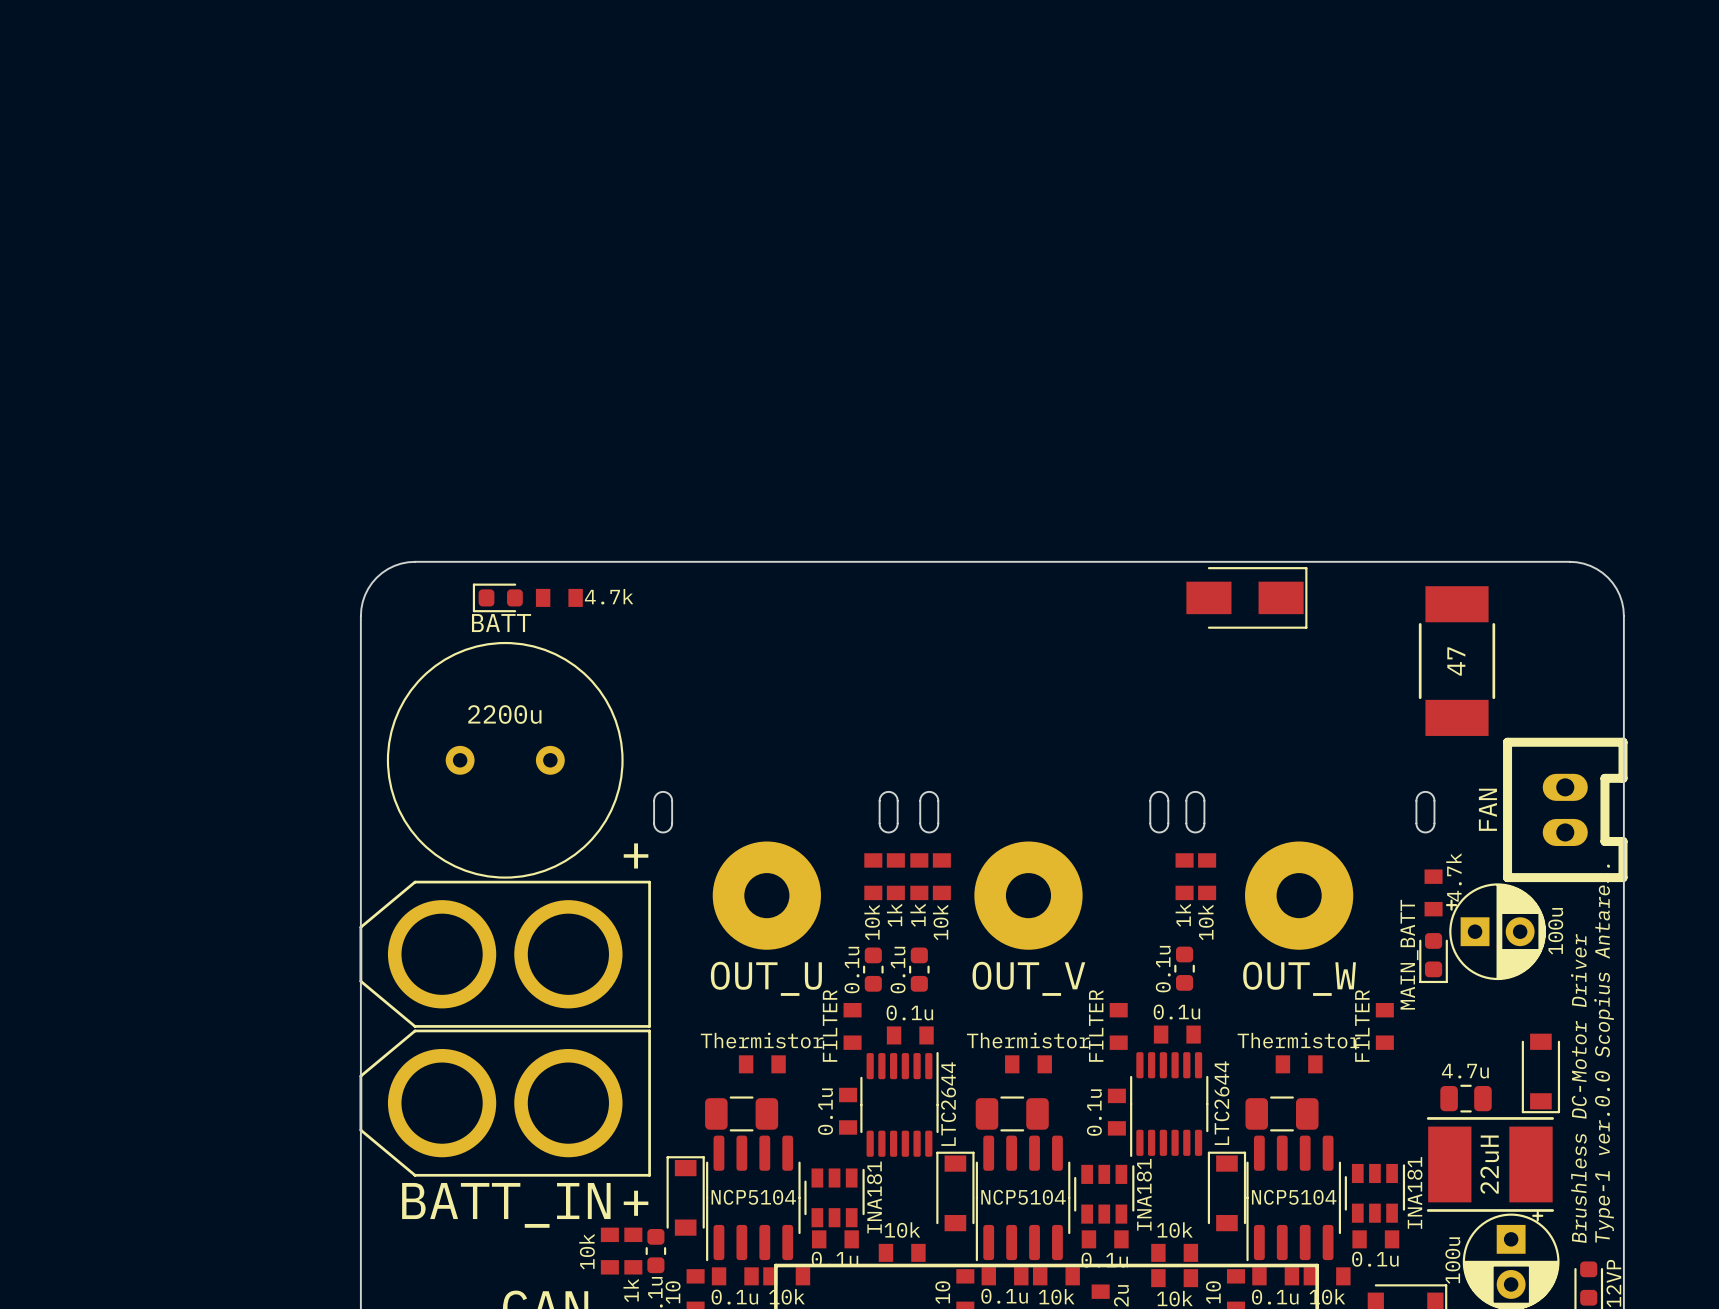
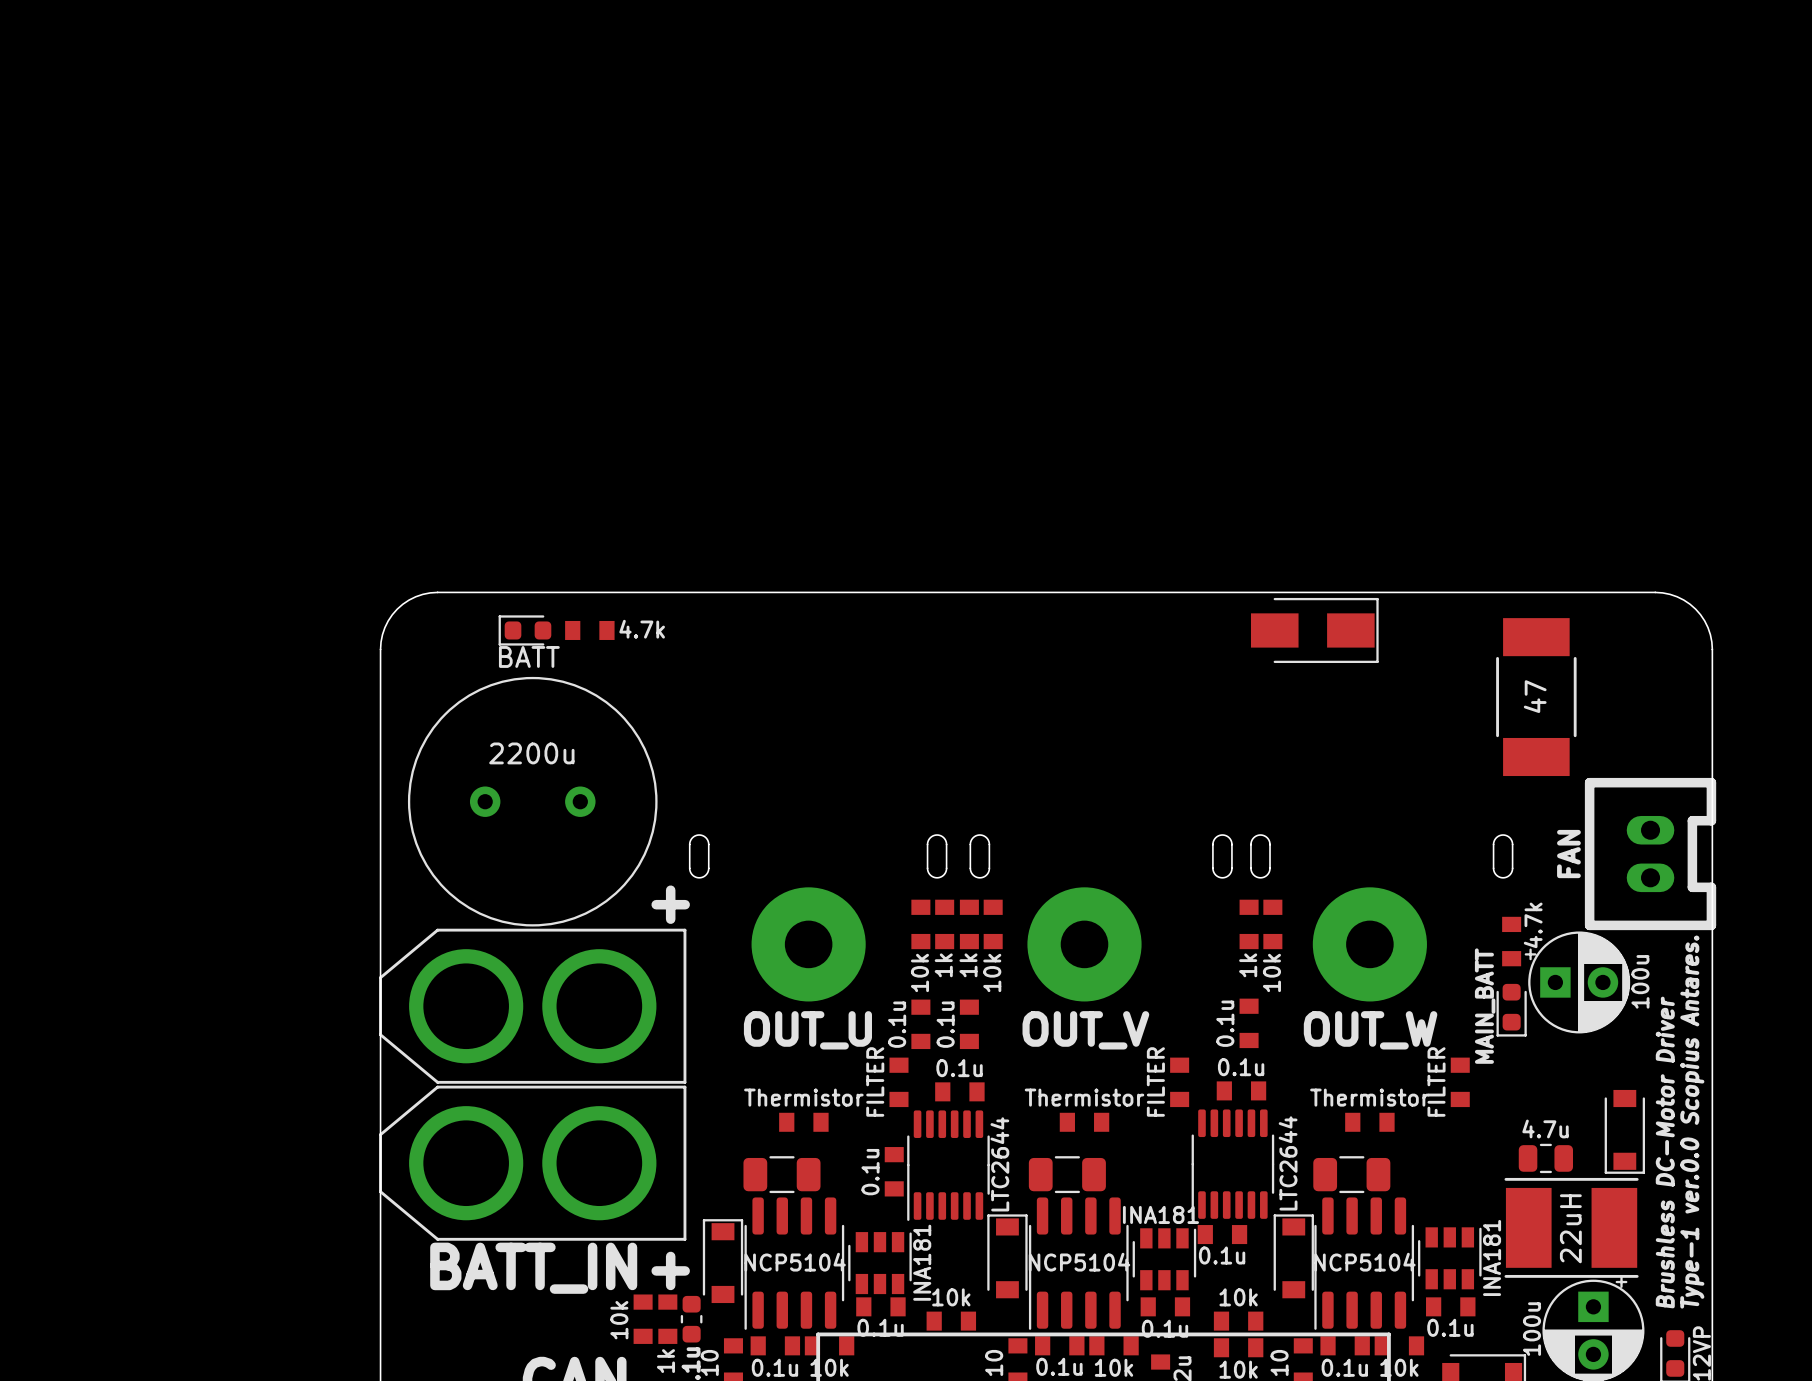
part footprint: [1174, 946, 1195, 991] -> [1239, 998, 1259, 1049]
part footprint: [863, 947, 884, 992] -> [911, 999, 931, 1050]
part footprint: [909, 947, 930, 992] -> [959, 999, 979, 1050]
part rotation: 0° (899, 1104) -> 180° (948, 1165)
part rotation: 0° (1116, 1112) -> 90° clockwise (1222, 1234)
part position: (1116, 1112) -> (1222, 1234)
part value rotation: 0° (1144, 1194) -> 90° clockwise (1160, 1214)

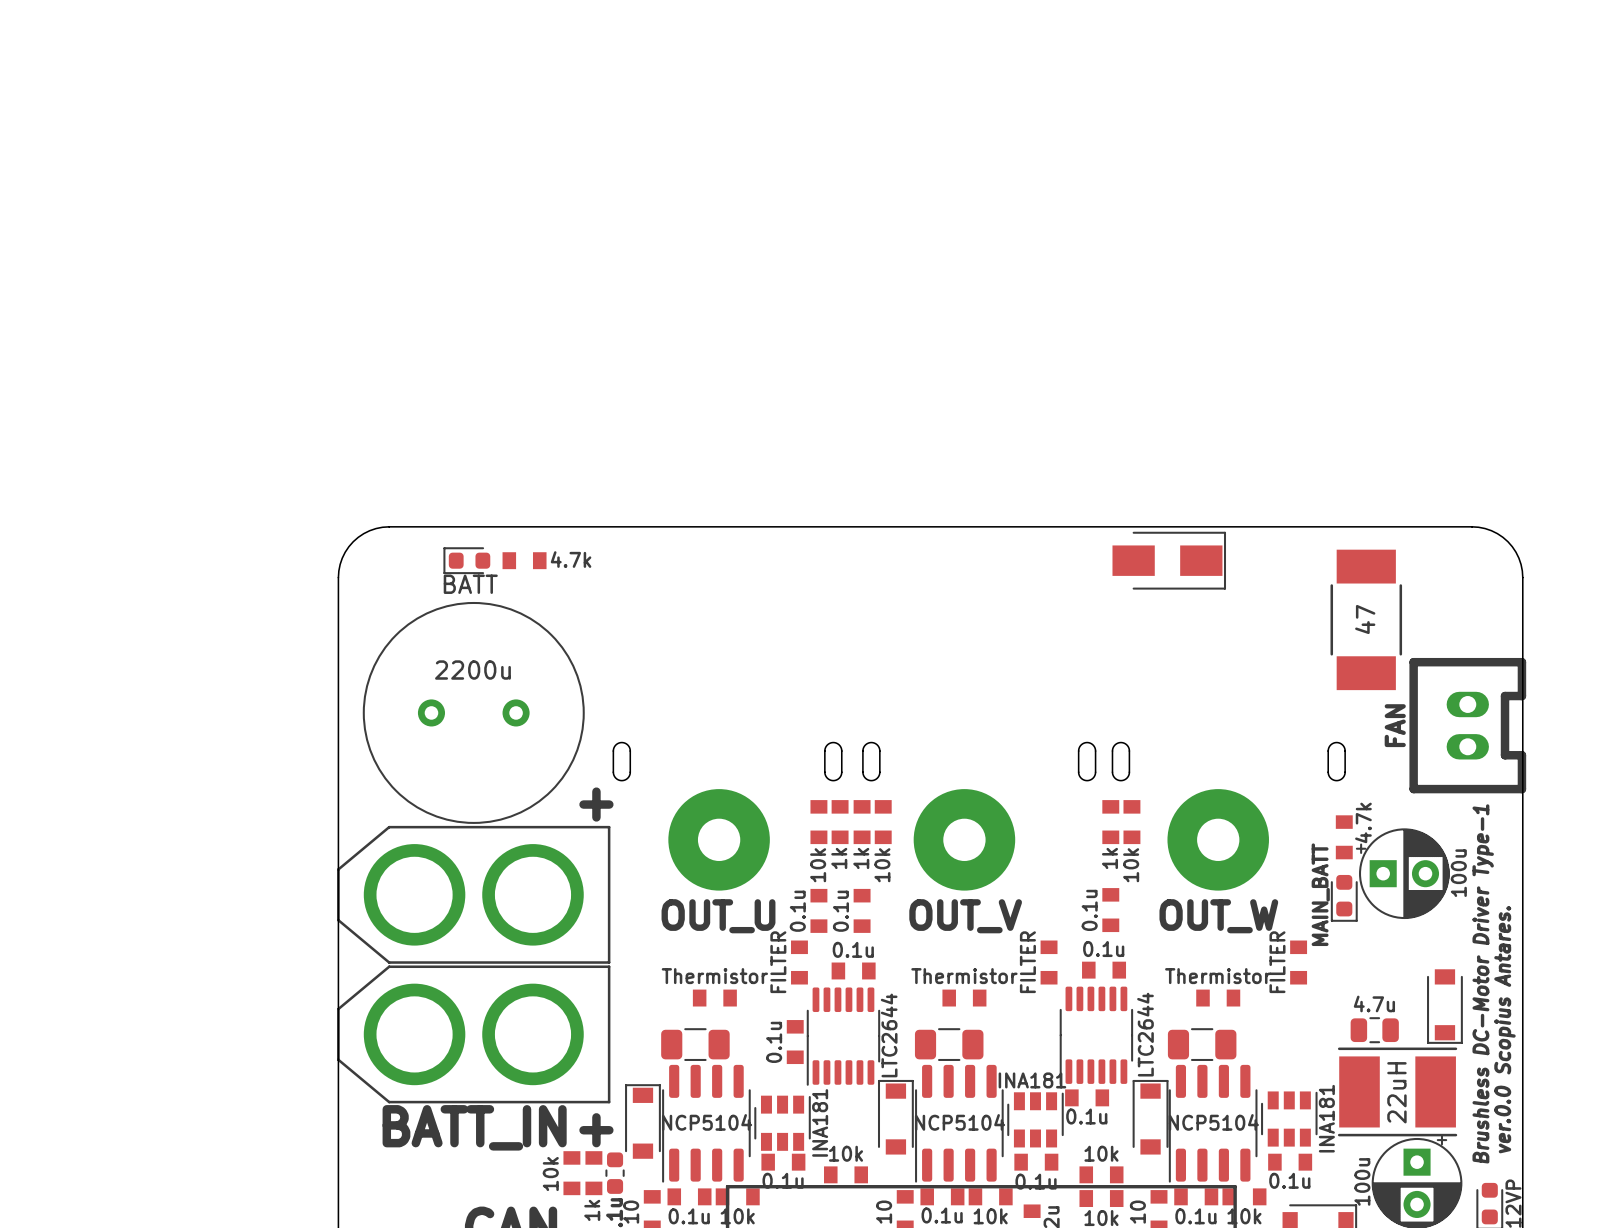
part position: (1650, 854) -> (1467, 725)
text: Type-1 ver.0.0 Scopius Antares. (1692, 1122) -> ver.0.0 Scopius Antares. (1504, 1029)
text: Brushless DC-Motor Driver (1665, 1152) -> Brushless DC-Motor Driver Type-1 (1483, 983)

